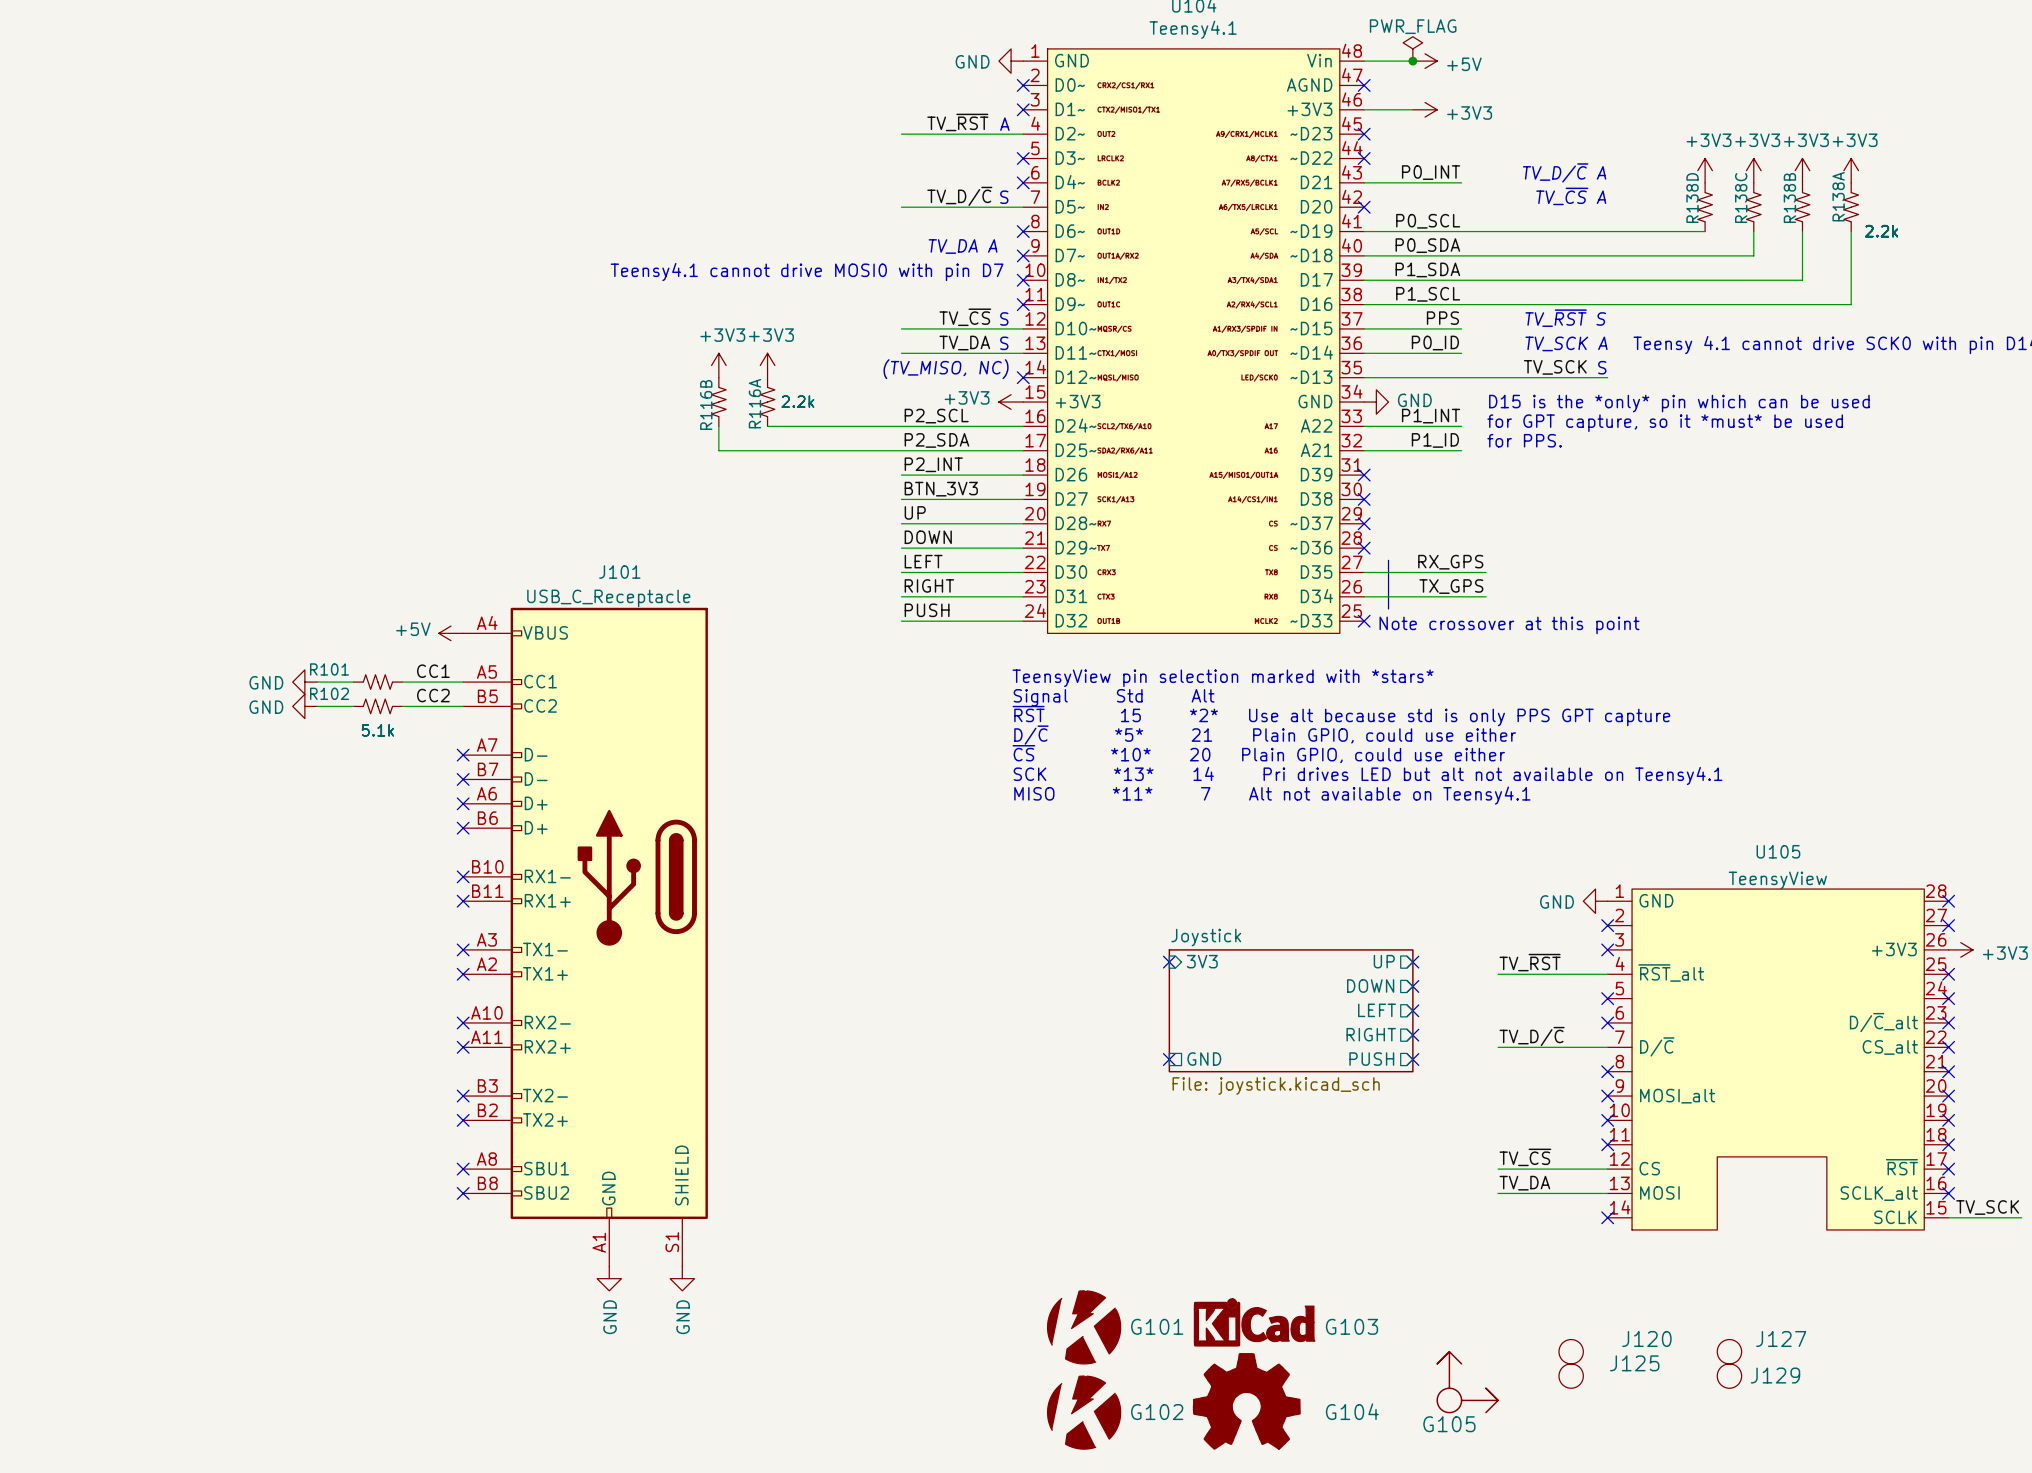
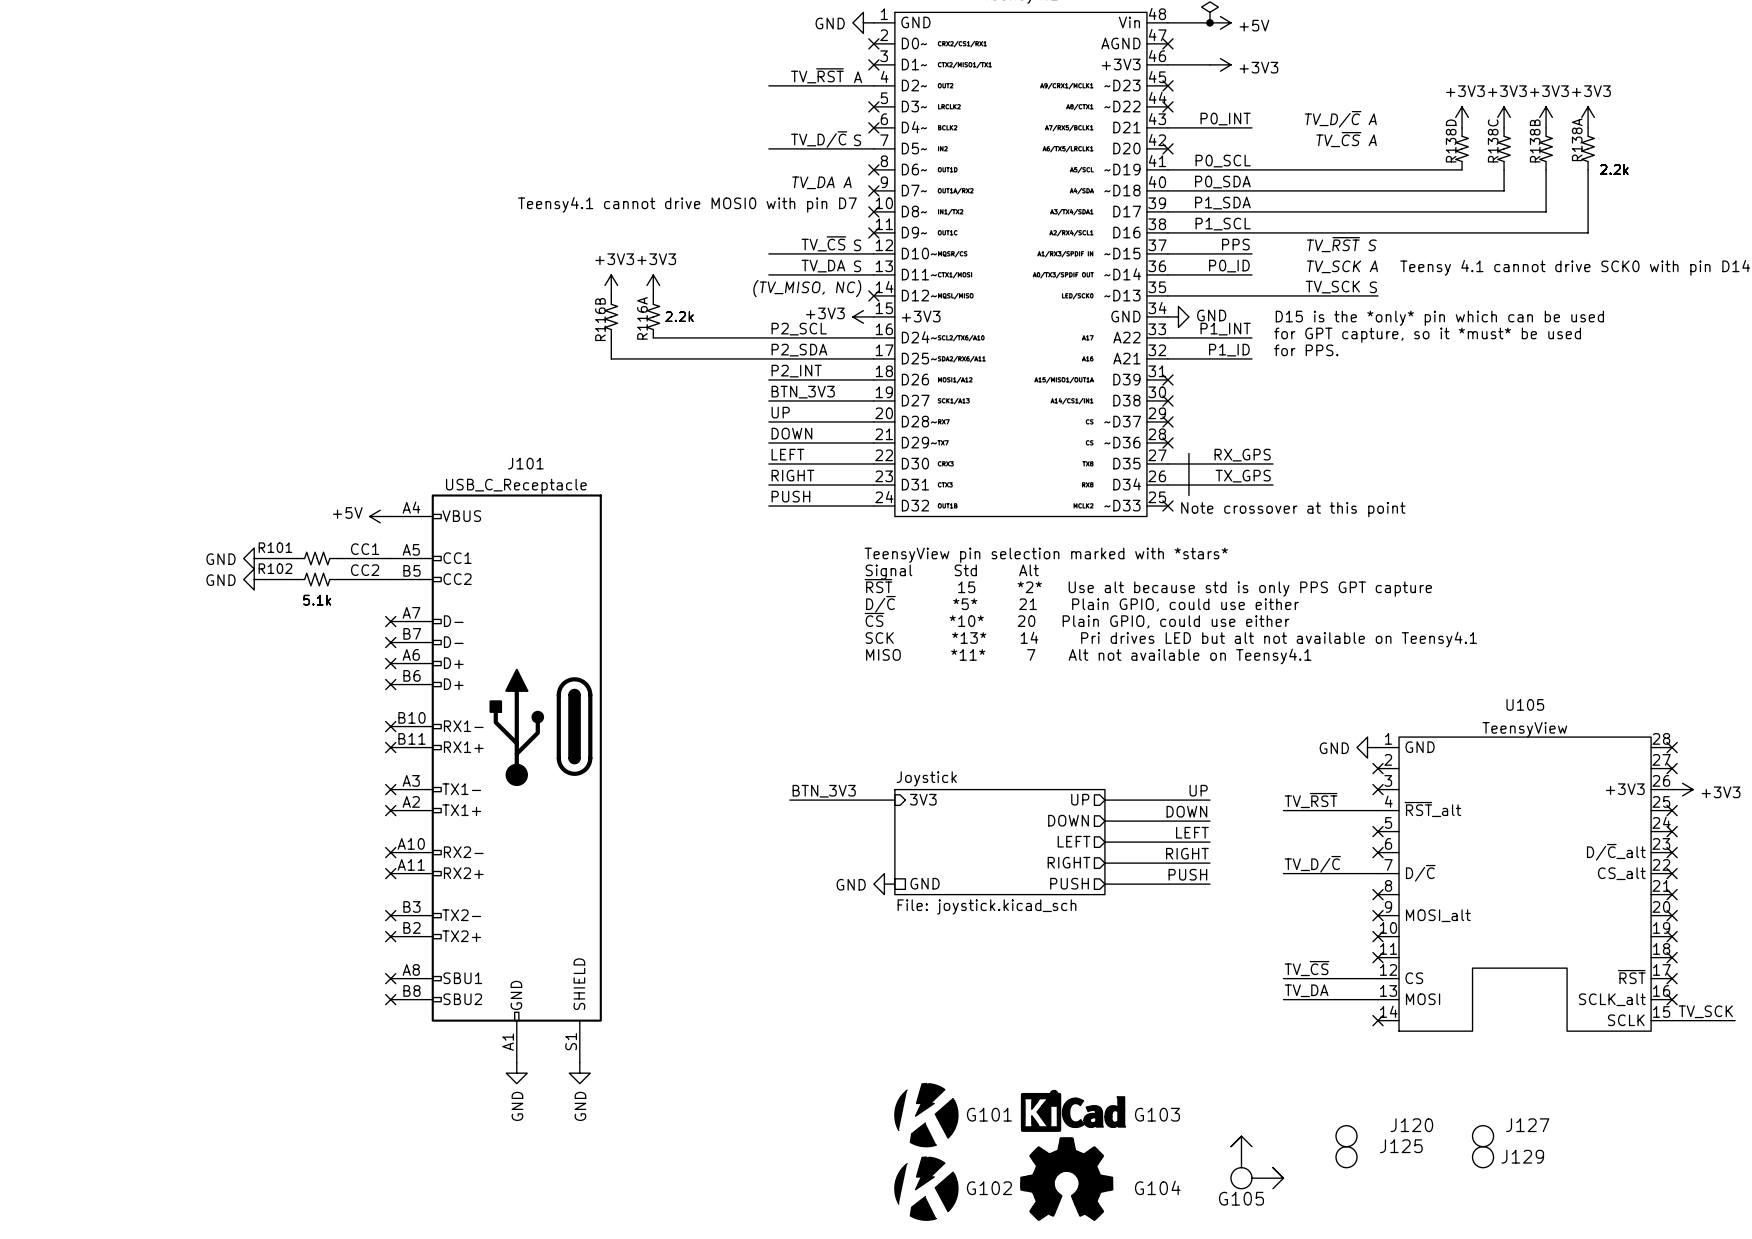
label: none -> BTN_3V3 (824, 791)
label: none -> UP (1198, 790)
sheet pin position: 3V3 (1202, 961) -> 3V3 (923, 799)
sheet pin position: UP (1384, 961) -> UP (1080, 799)
wire: none -> (789, 800) (894, 800)
no-connect mark: (1169, 962) -> none
wire: none -> (1104, 800) (1209, 800)
no-connect mark: (1412, 962) -> none
label: none -> DOWN (1186, 811)
wire: none -> (1104, 821) (1209, 821)
sheet pin position: DOWN (1370, 986) -> DOWN (1068, 820)
no-connect mark: (1412, 986) -> none
label: none -> LEFT (1192, 832)
wire: none -> (1104, 842) (1209, 842)
sheet Joystick position: (1291, 1010) -> (999, 842)
sheet pin position: LEFT (1377, 1010) -> LEFT (1074, 841)
no-connect mark: (1412, 1010) -> none
label: none -> RIGHT (1187, 853)
sheet pin position: RIGHT (1371, 1034) -> RIGHT (1069, 862)
wire: none -> (1104, 863) (1209, 863)
no-connect mark: (1412, 1035) -> none
label: none -> PUSH (1187, 874)
power symbol: none -> GND (884, 884)
no-connect mark: (1169, 1059) -> none
sheet pin position: GND (1204, 1059) -> GND (925, 883)
wire: none -> (1104, 884) (1209, 884)
sheet pin position: PUSH (1371, 1059) -> PUSH (1069, 883)
no-connect mark: (1412, 1059) -> none

